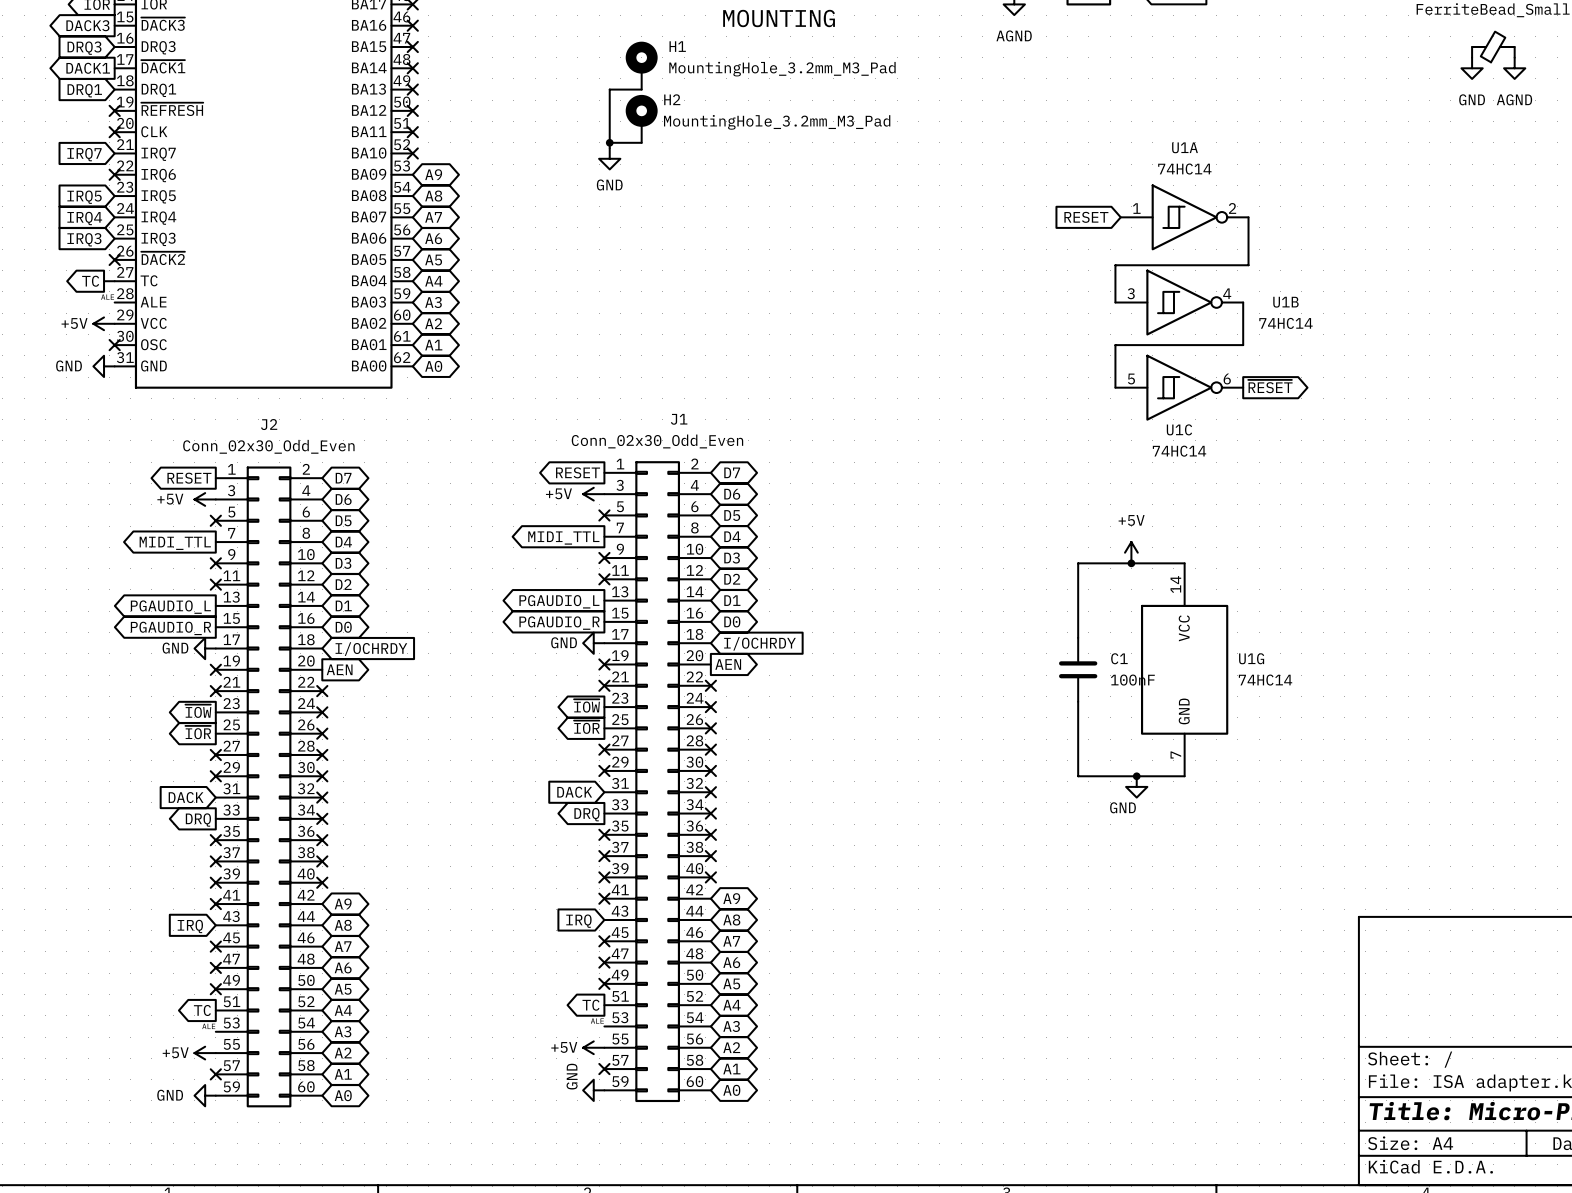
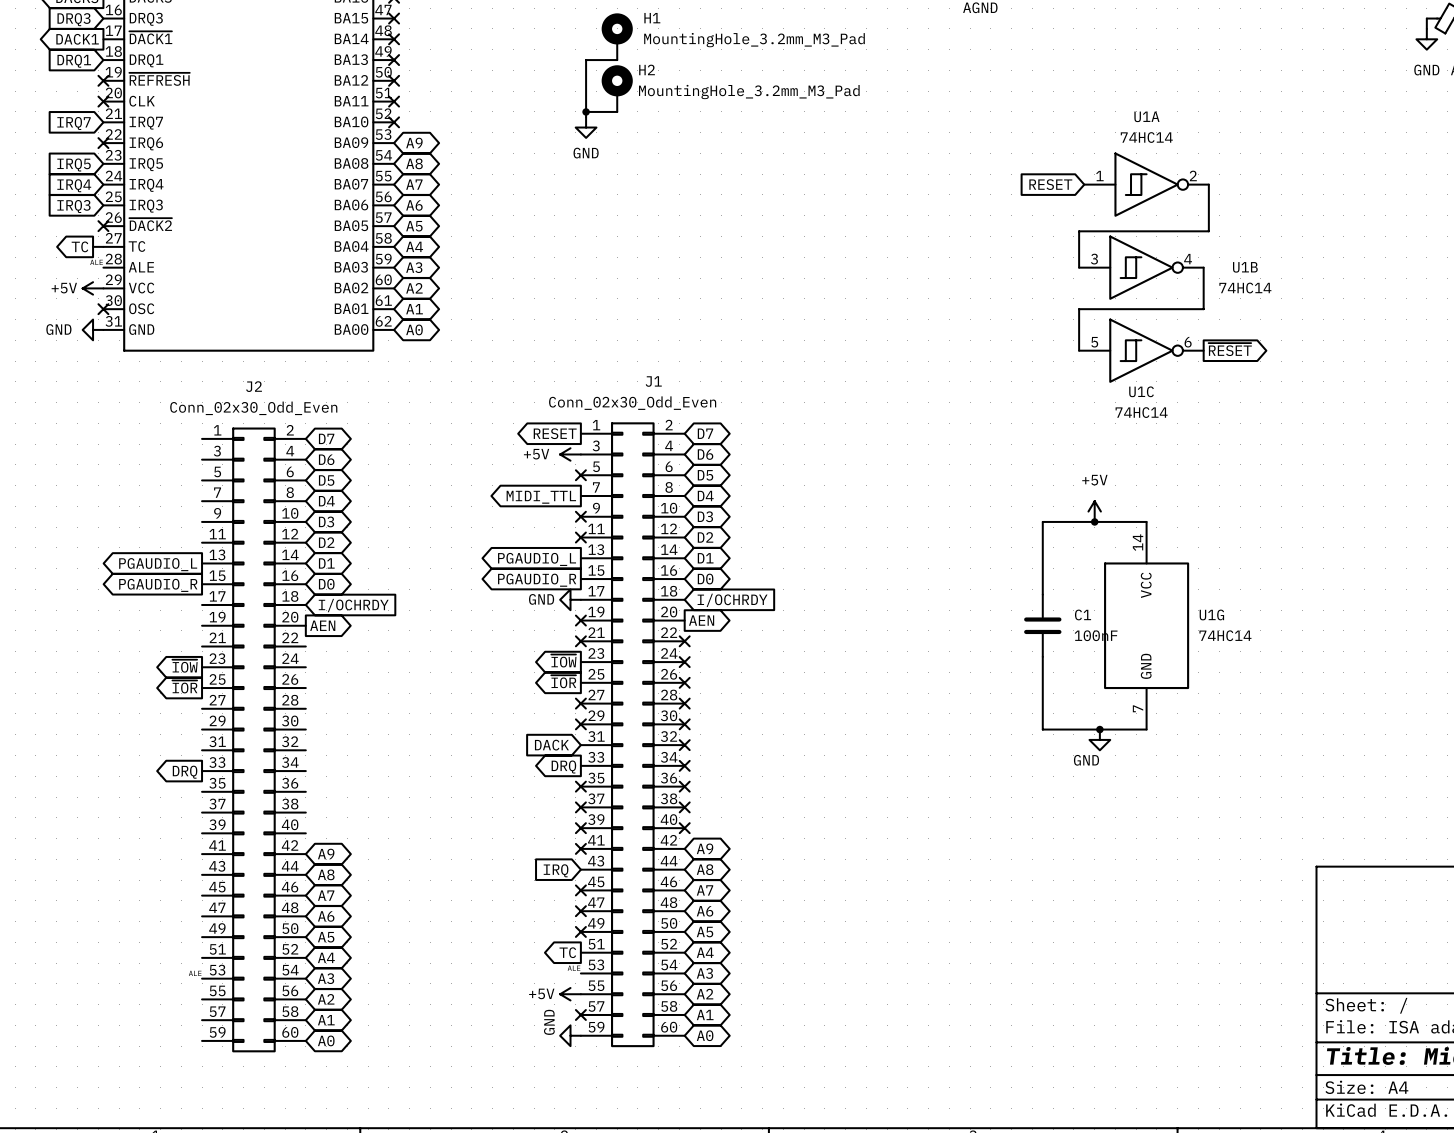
global label: RESET (189, 478) -> none
power symbol: +5V (205, 499) -> none
no-connect mark: (215, 520) -> none
global label: MIDI_TTL (175, 543) -> none
no-connect mark: (215, 563) -> none
no-connect mark: (215, 584) -> none
power symbol: GND (205, 648) -> none
no-connect mark: (215, 669) -> none
no-connect mark: (215, 691) -> none
no-connect mark: (322, 691) -> none
no-connect mark: (322, 712) -> none
no-connect mark: (322, 733) -> none
no-connect mark: (215, 754) -> none
no-connect mark: (322, 754) -> none
no-connect mark: (215, 776) -> none
no-connect mark: (322, 776) -> none
global label: DACK (186, 797) -> none
no-connect mark: (322, 797) -> none
no-connect mark: (322, 818) -> none
no-connect mark: (215, 840) -> none
no-connect mark: (322, 840) -> none
no-connect mark: (215, 861) -> none
no-connect mark: (322, 861) -> none
no-connect mark: (215, 882) -> none
no-connect mark: (322, 882) -> none
no-connect mark: (215, 904) -> none
global label: IRQ (190, 926) -> none
no-connect mark: (215, 946) -> none
no-connect mark: (215, 967) -> none
no-connect mark: (215, 989) -> none
global label: TC (202, 1010) -> none
power symbol: +5V (205, 1053) -> none
no-connect mark: (215, 1074) -> none
power symbol: GND (205, 1095) -> none

